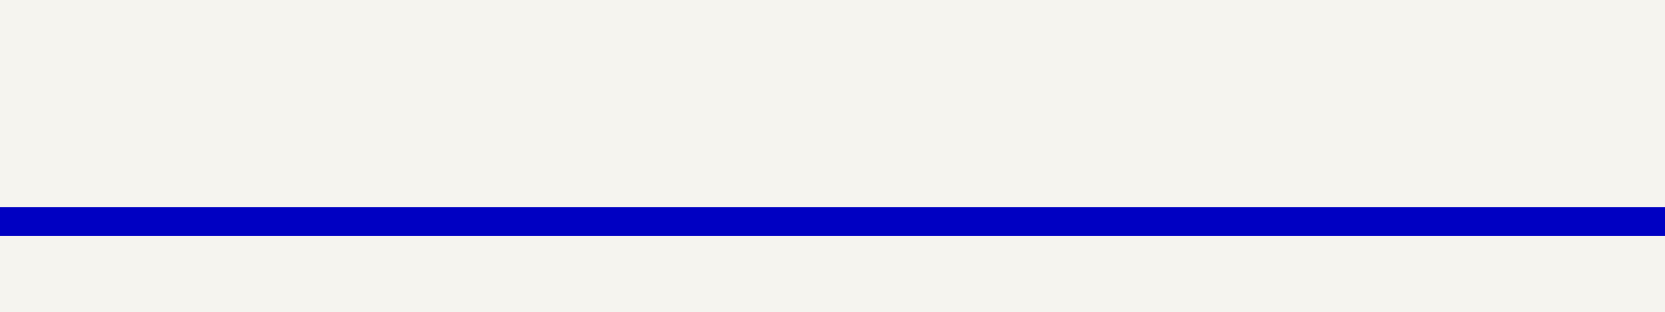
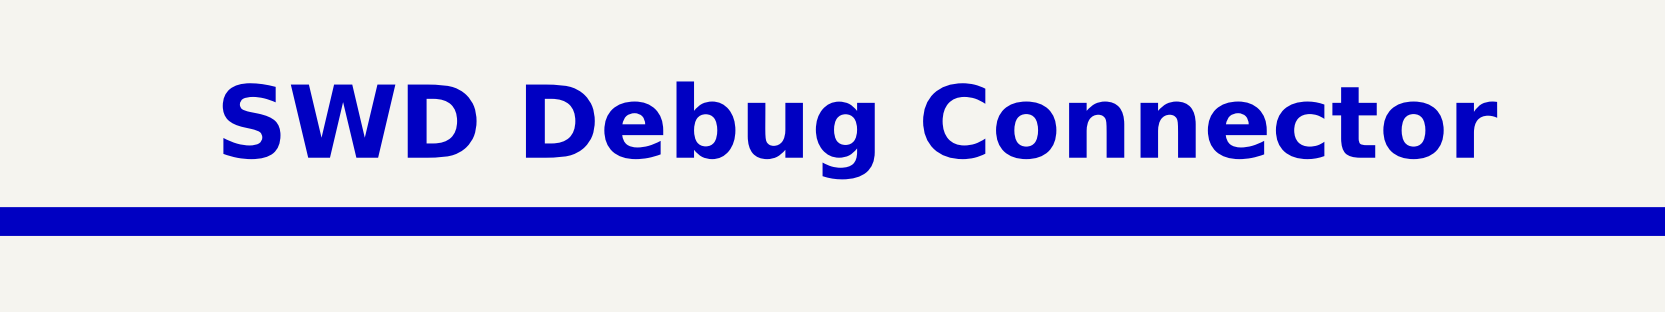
text: none -> SWD Debug Connector (859, 130)

